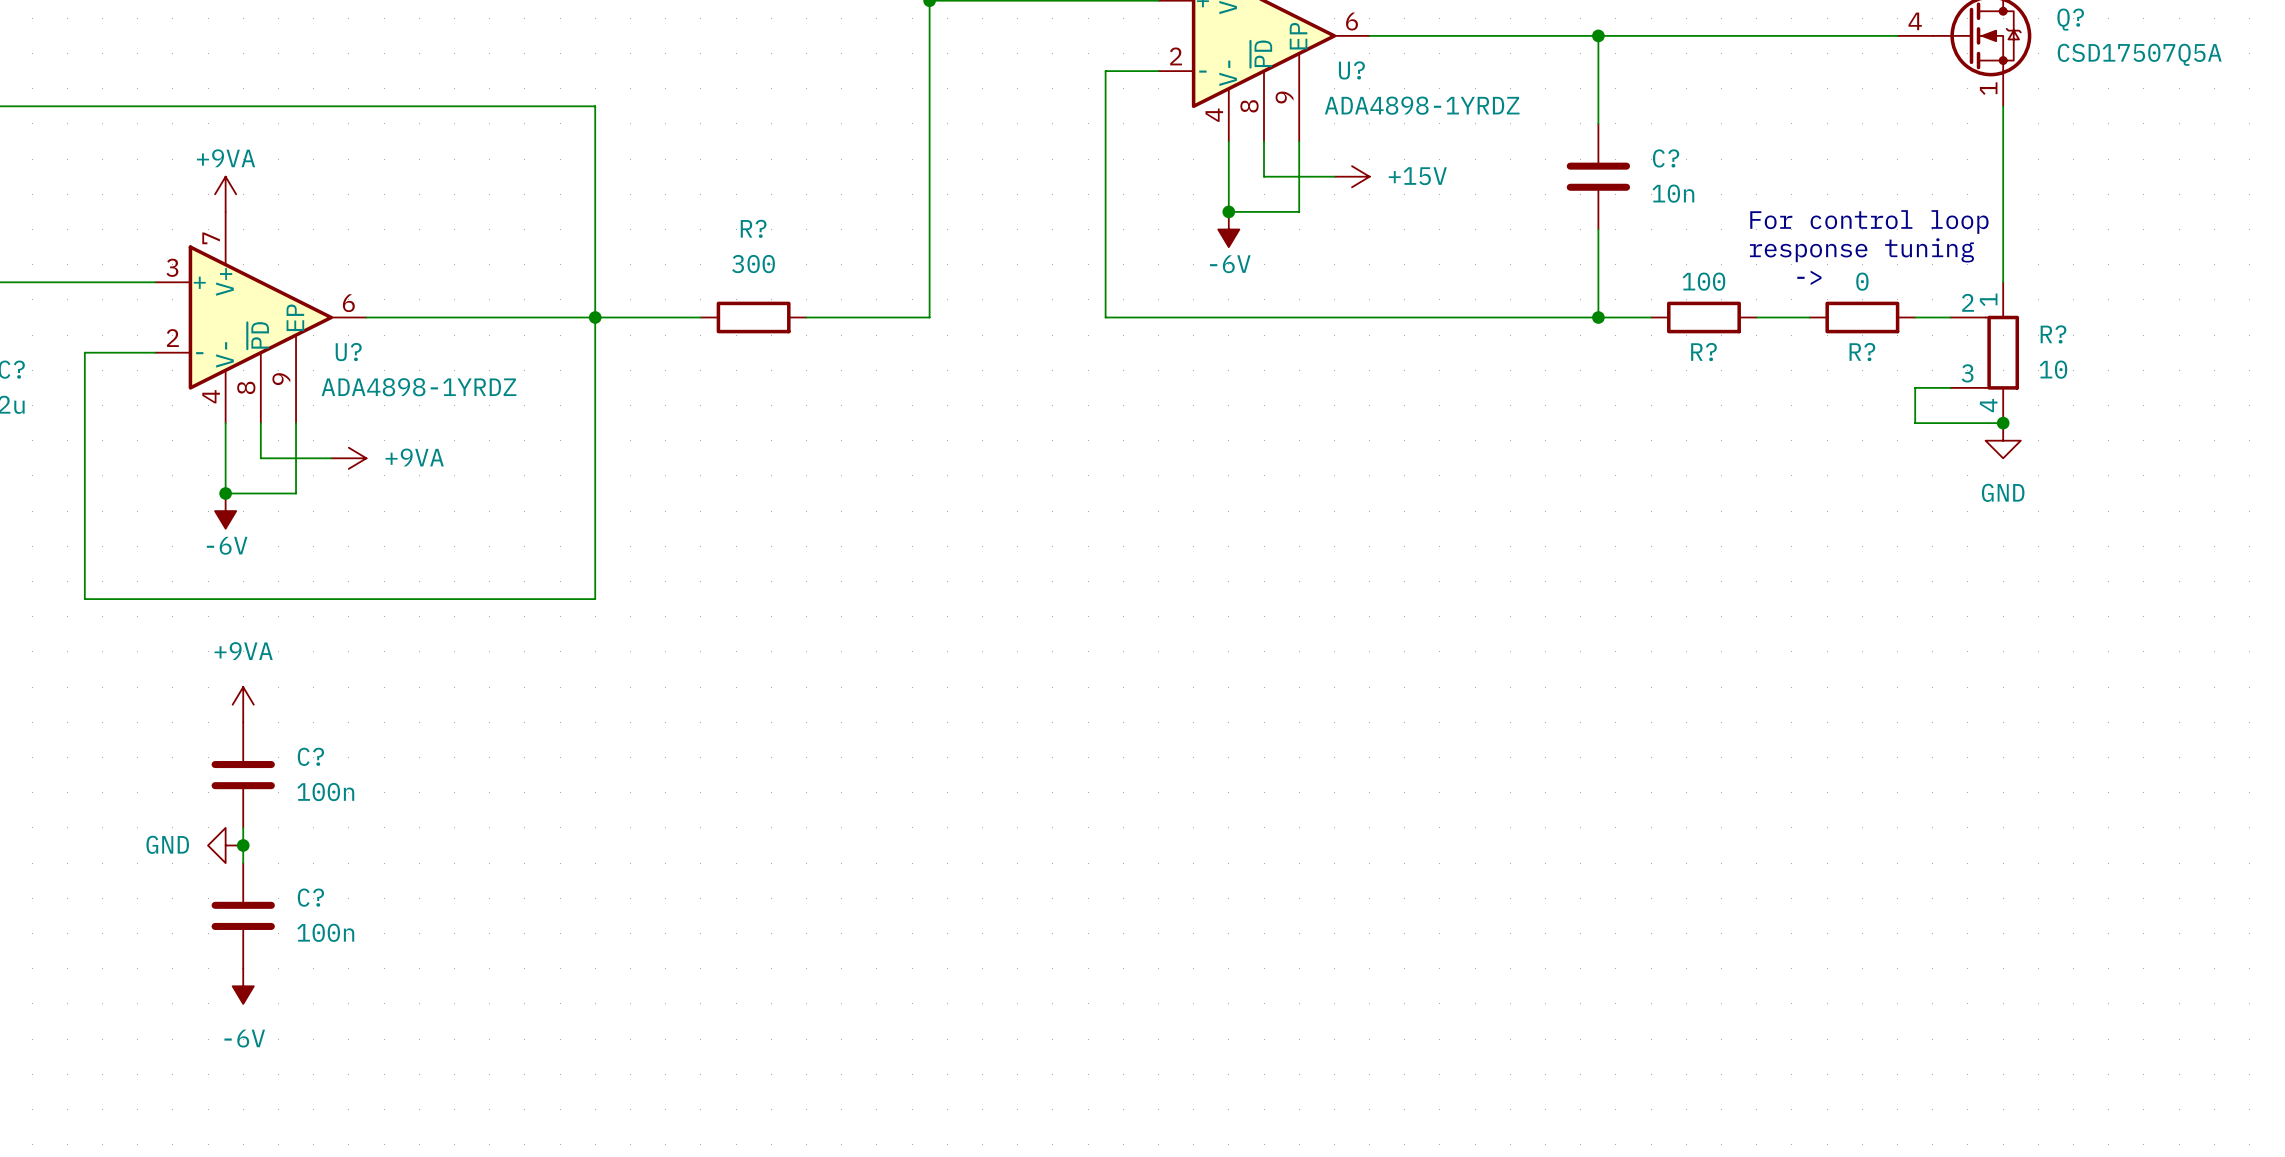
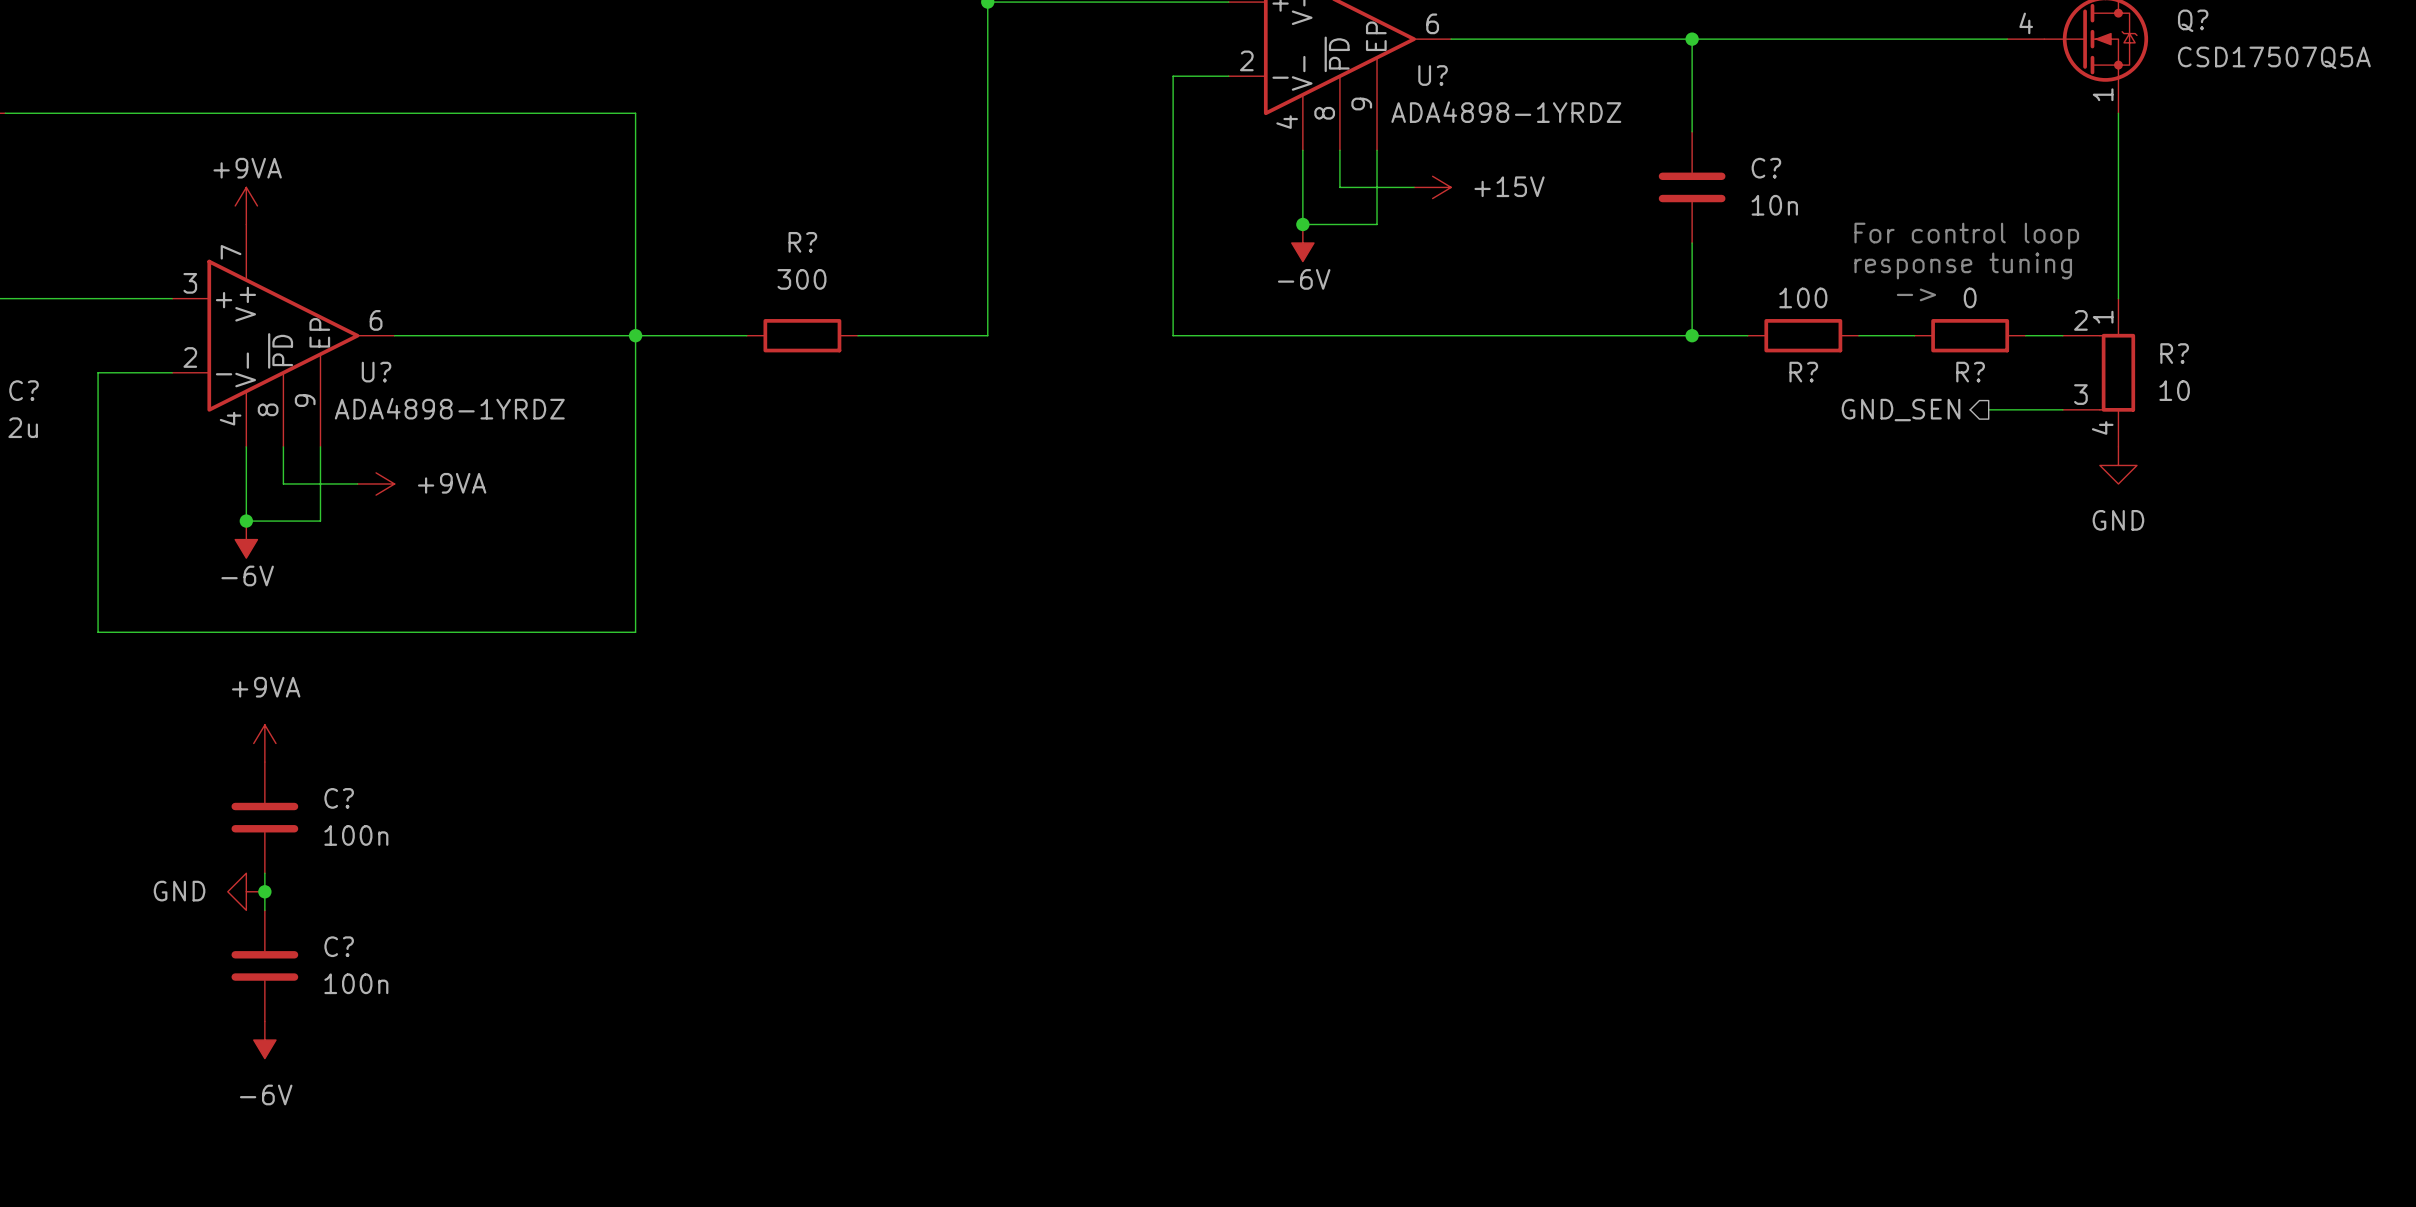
wire: (1915, 387) (1915, 423) (2003, 423) -> (2025, 409) (1988, 409)
hierarchical label: none -> GND_SEN (1901, 410)
junction: (2003, 423) -> none

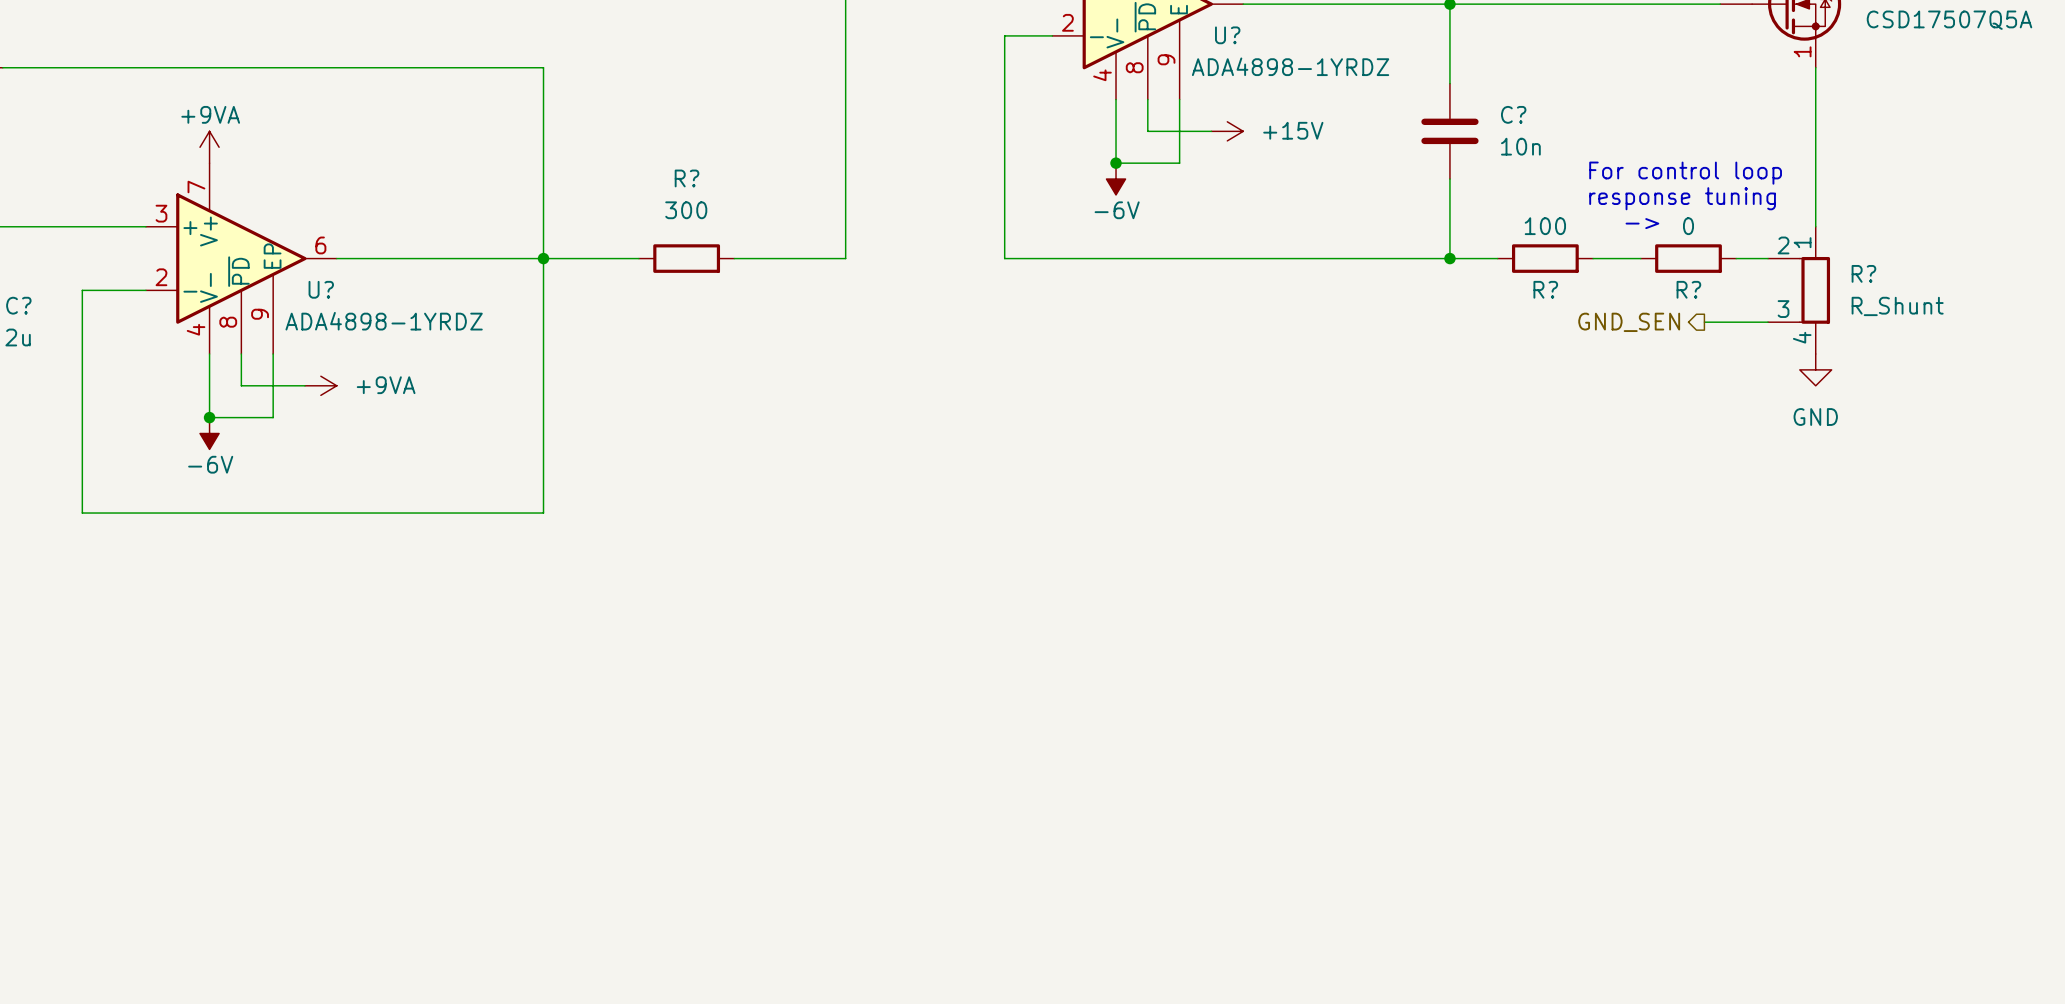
R? value: 10 (2174, 390) -> R_Shunt (1897, 306)
power symbol: +9VA (264, 743) -> none
C?: 100n (264, 817) -> none
wire: (264, 873) (264, 910) -> none
power symbol: GND (246, 891) -> none
junction: (264, 891) -> none
C?: 100n (264, 965) -> none
power symbol: -6V (264, 1040) -> none

